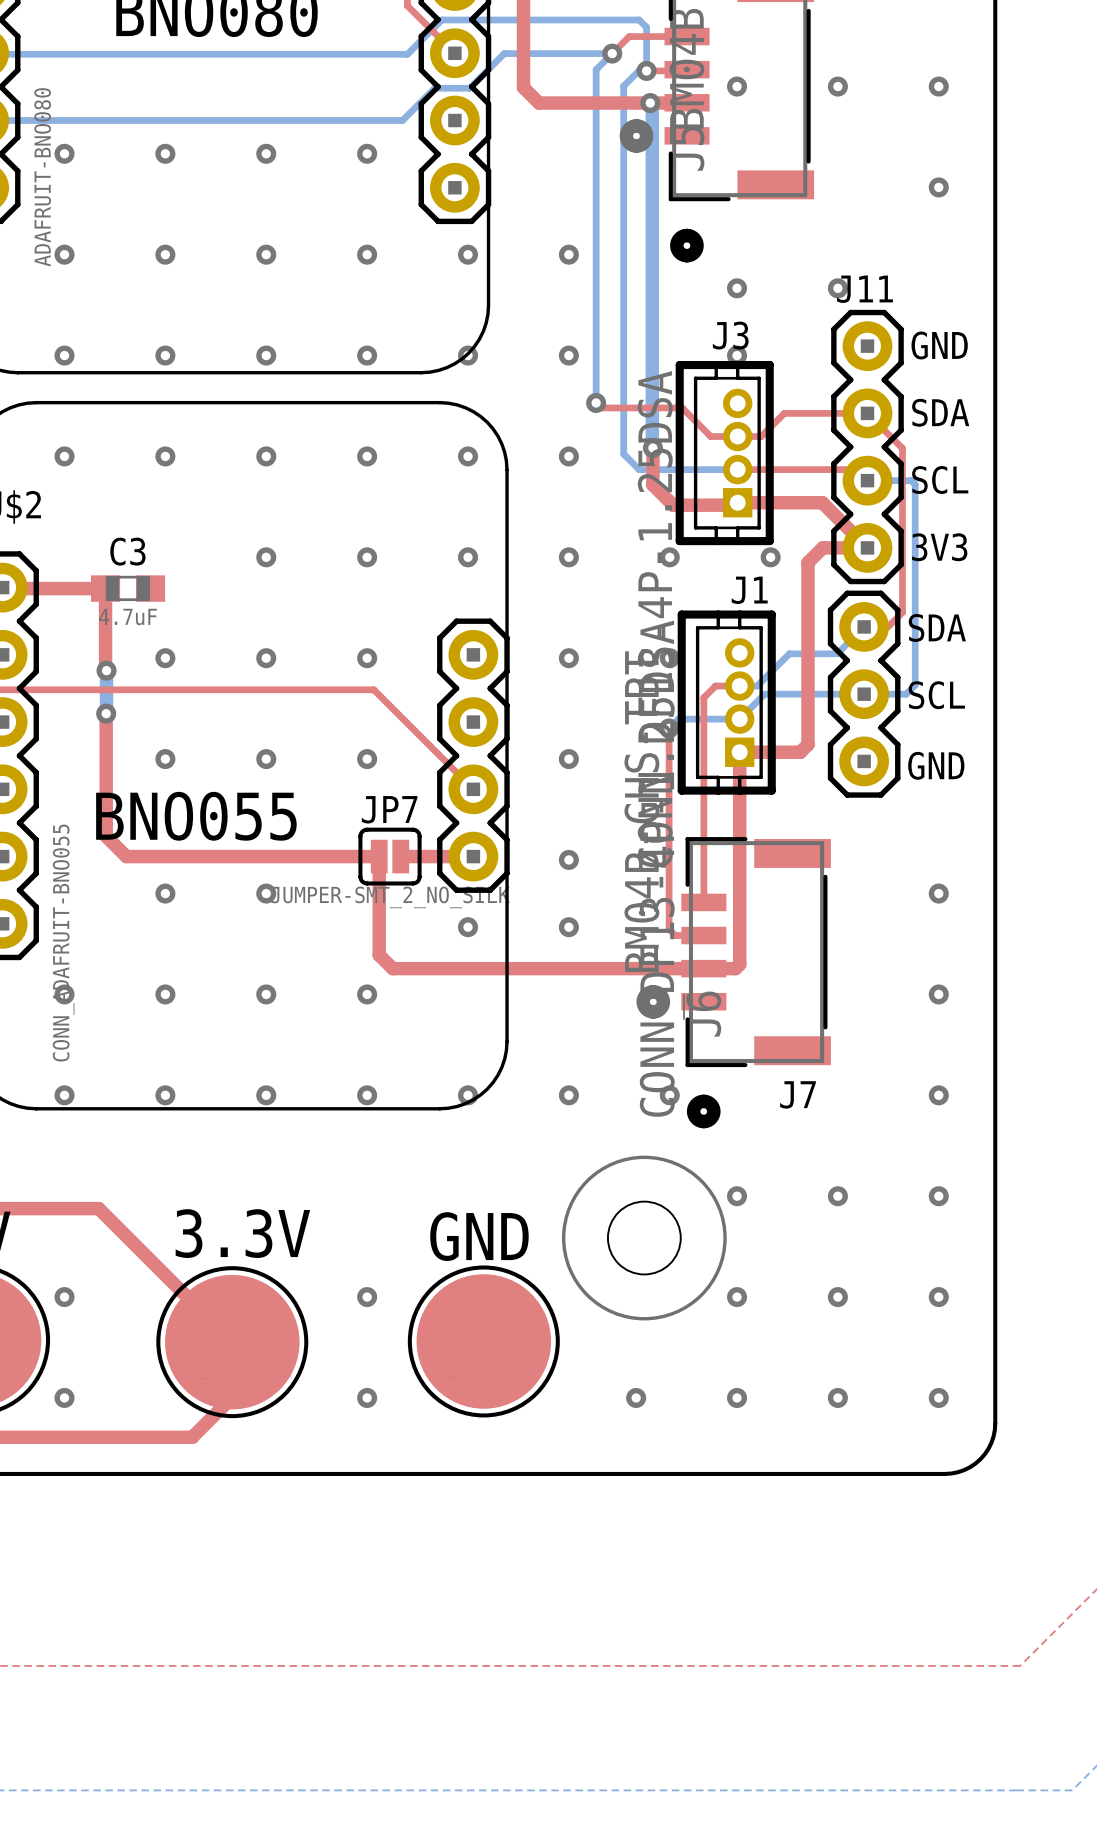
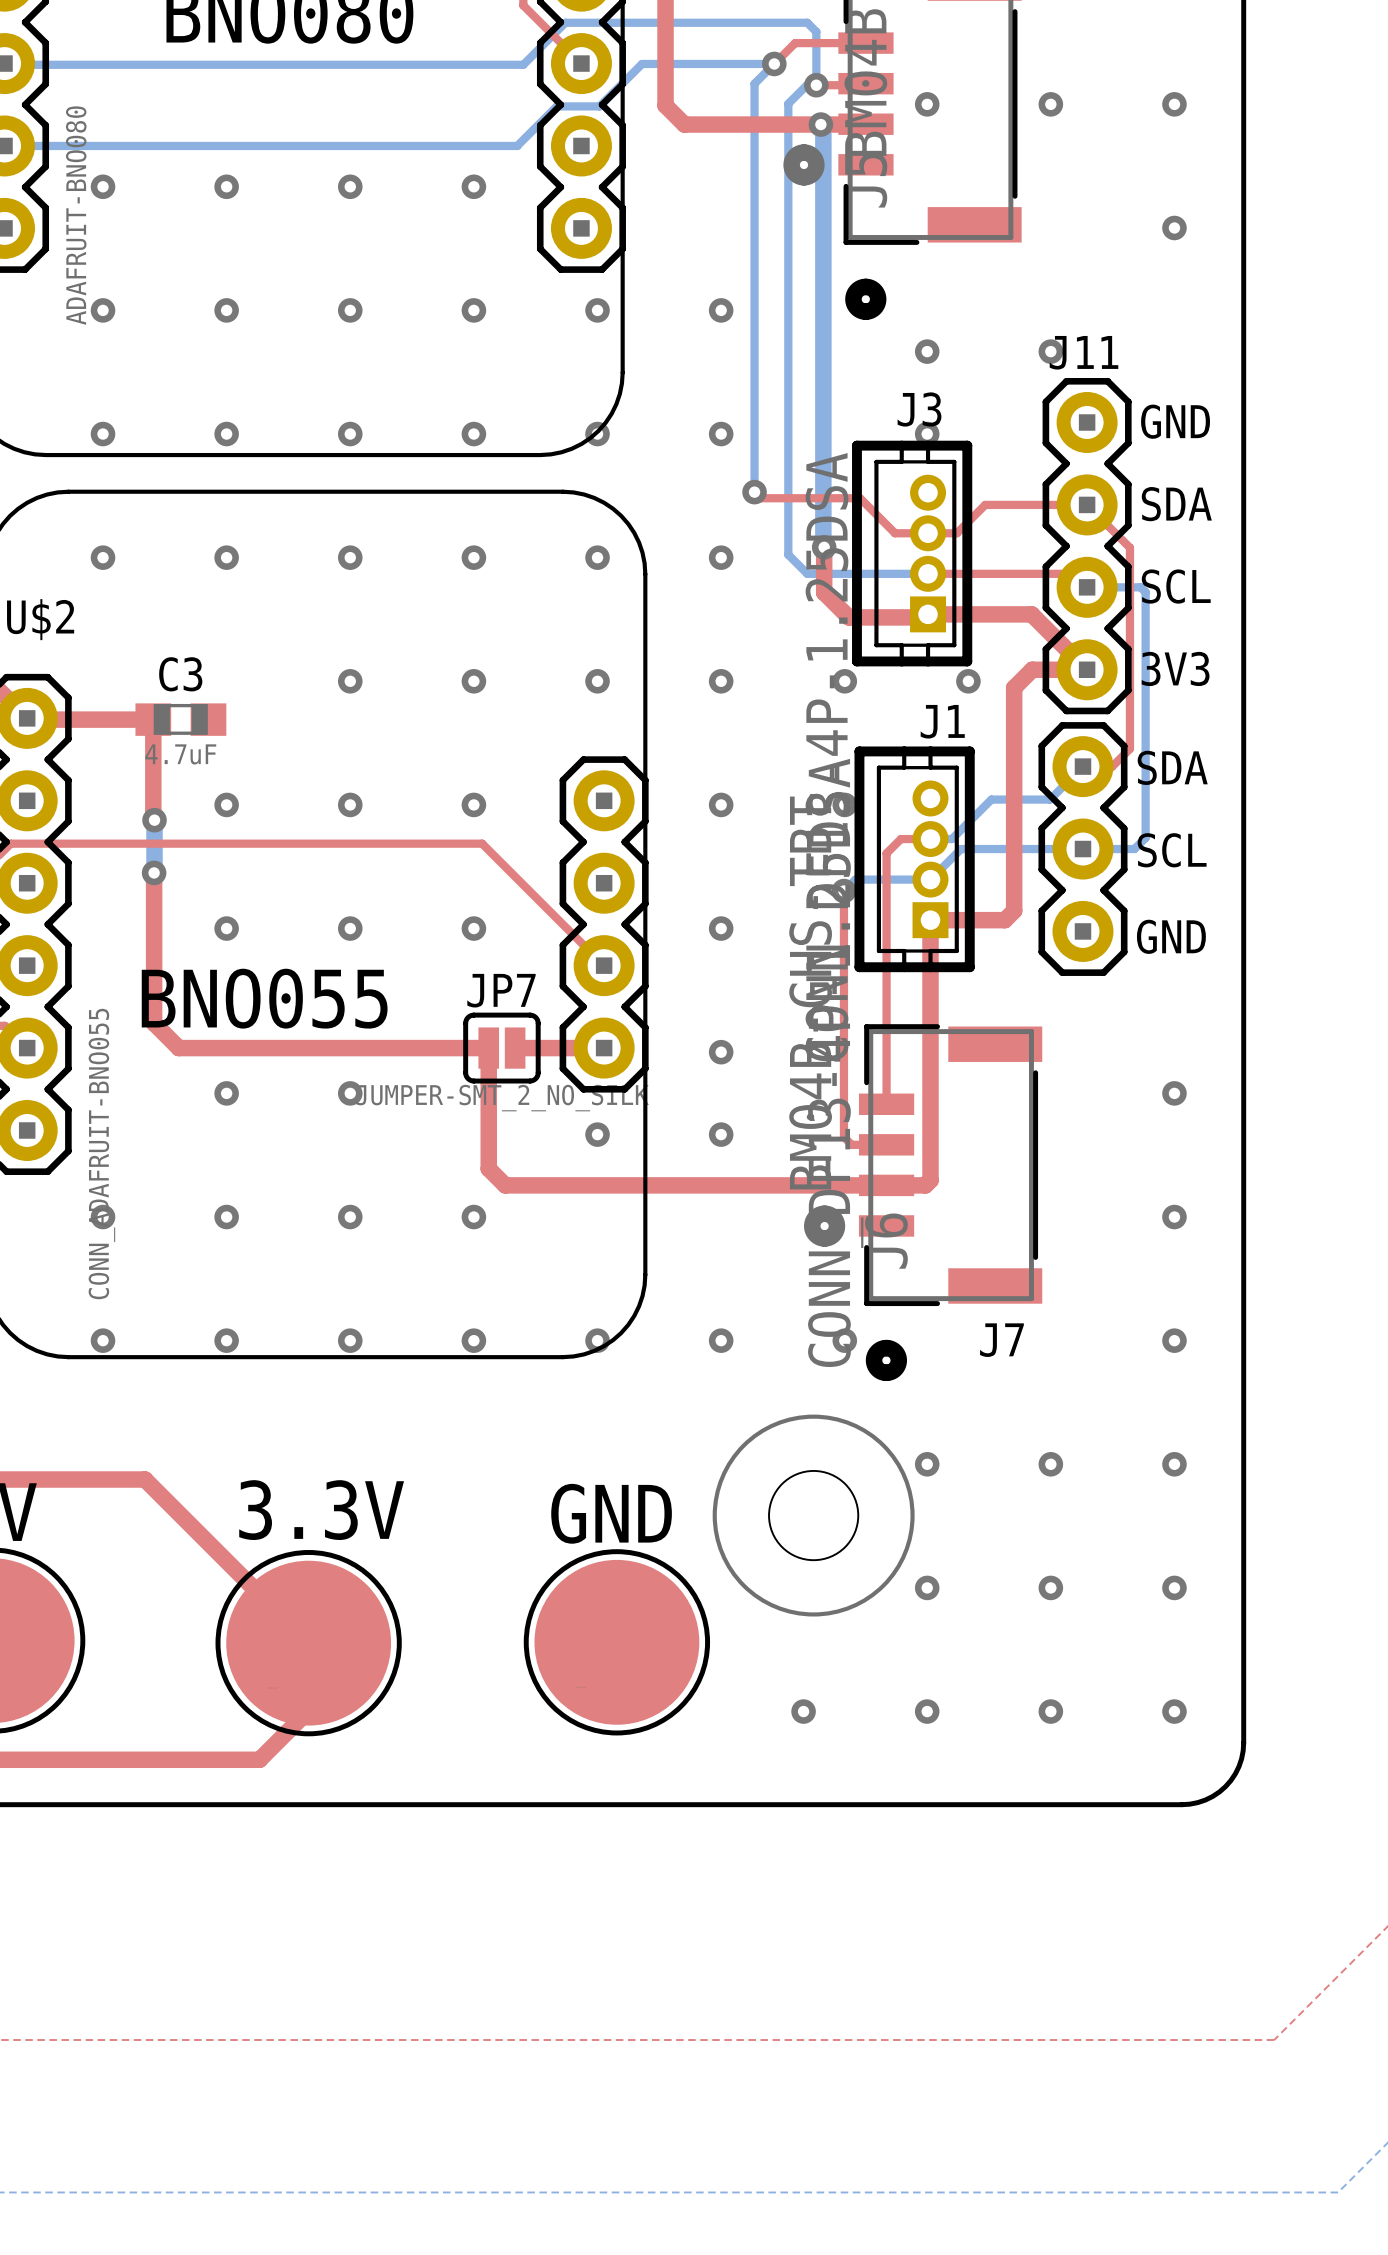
via: (64, 1297) -> none
via: (367, 1297) -> none
via: (64, 1397) -> none
via: (367, 1397) -> none

